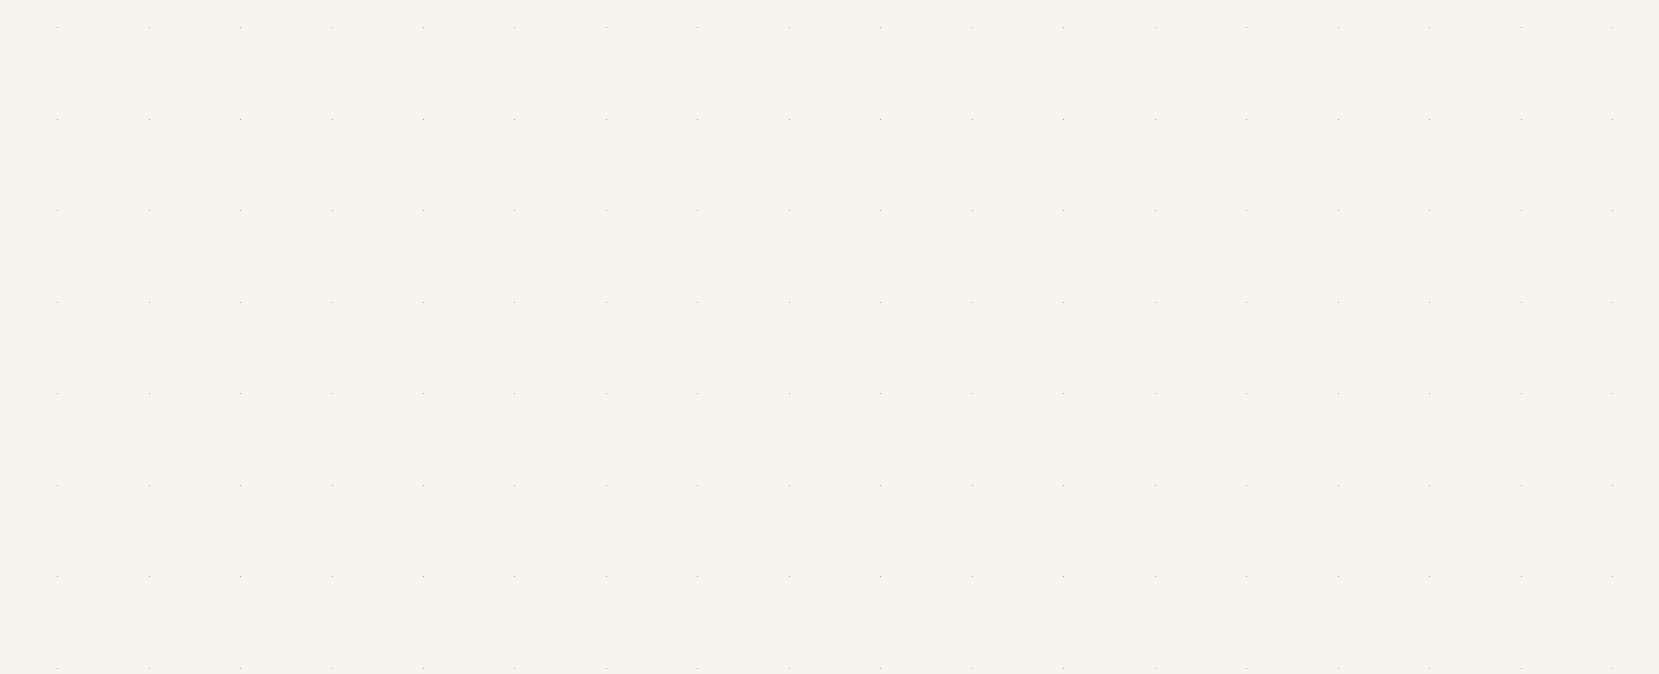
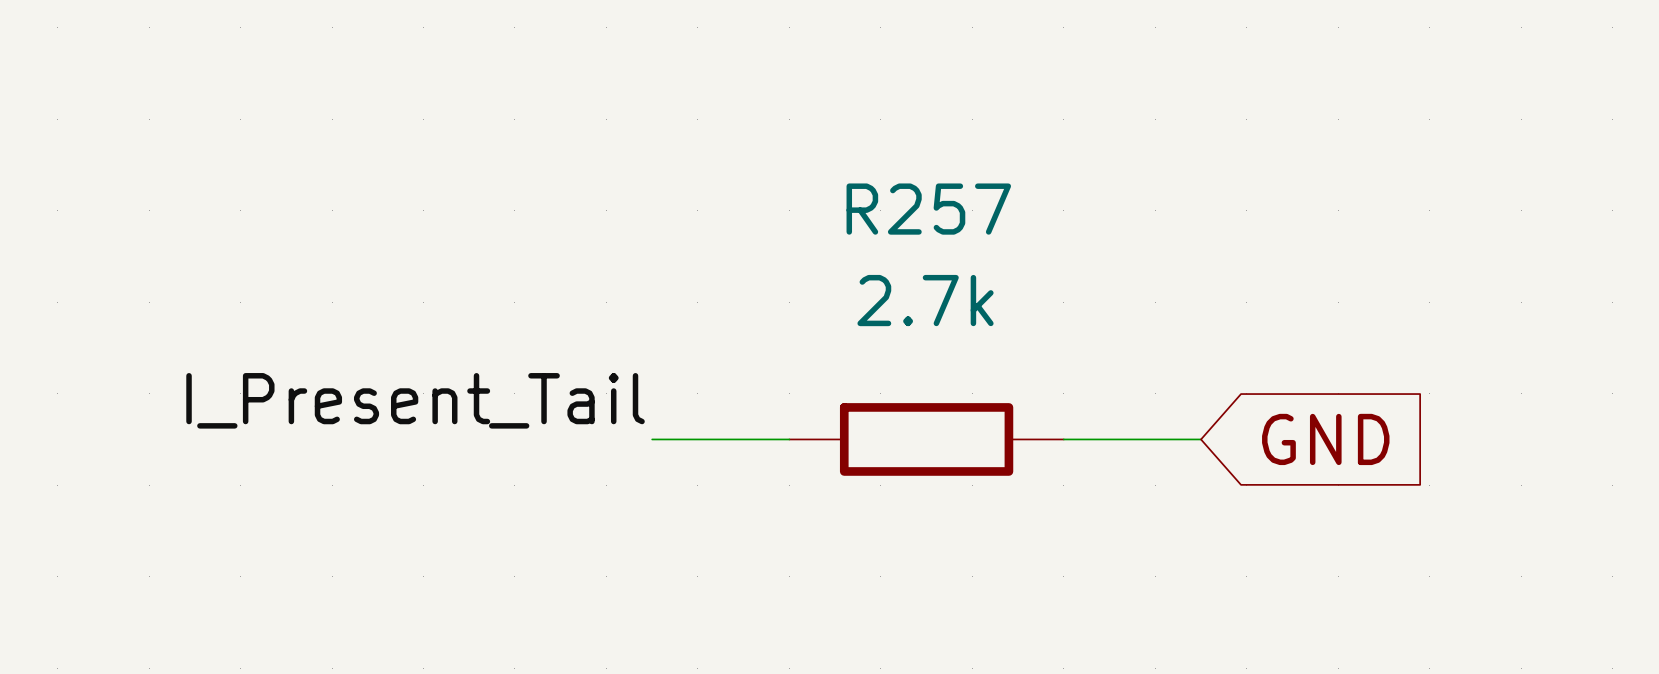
label: none -> I_Present_Tail (415, 400)
wire: none -> (652, 439) (789, 439)
R257: none -> 2.7k (926, 439)
wire: none -> (1063, 439) (1201, 439)
global label: none -> GND (1325, 439)

